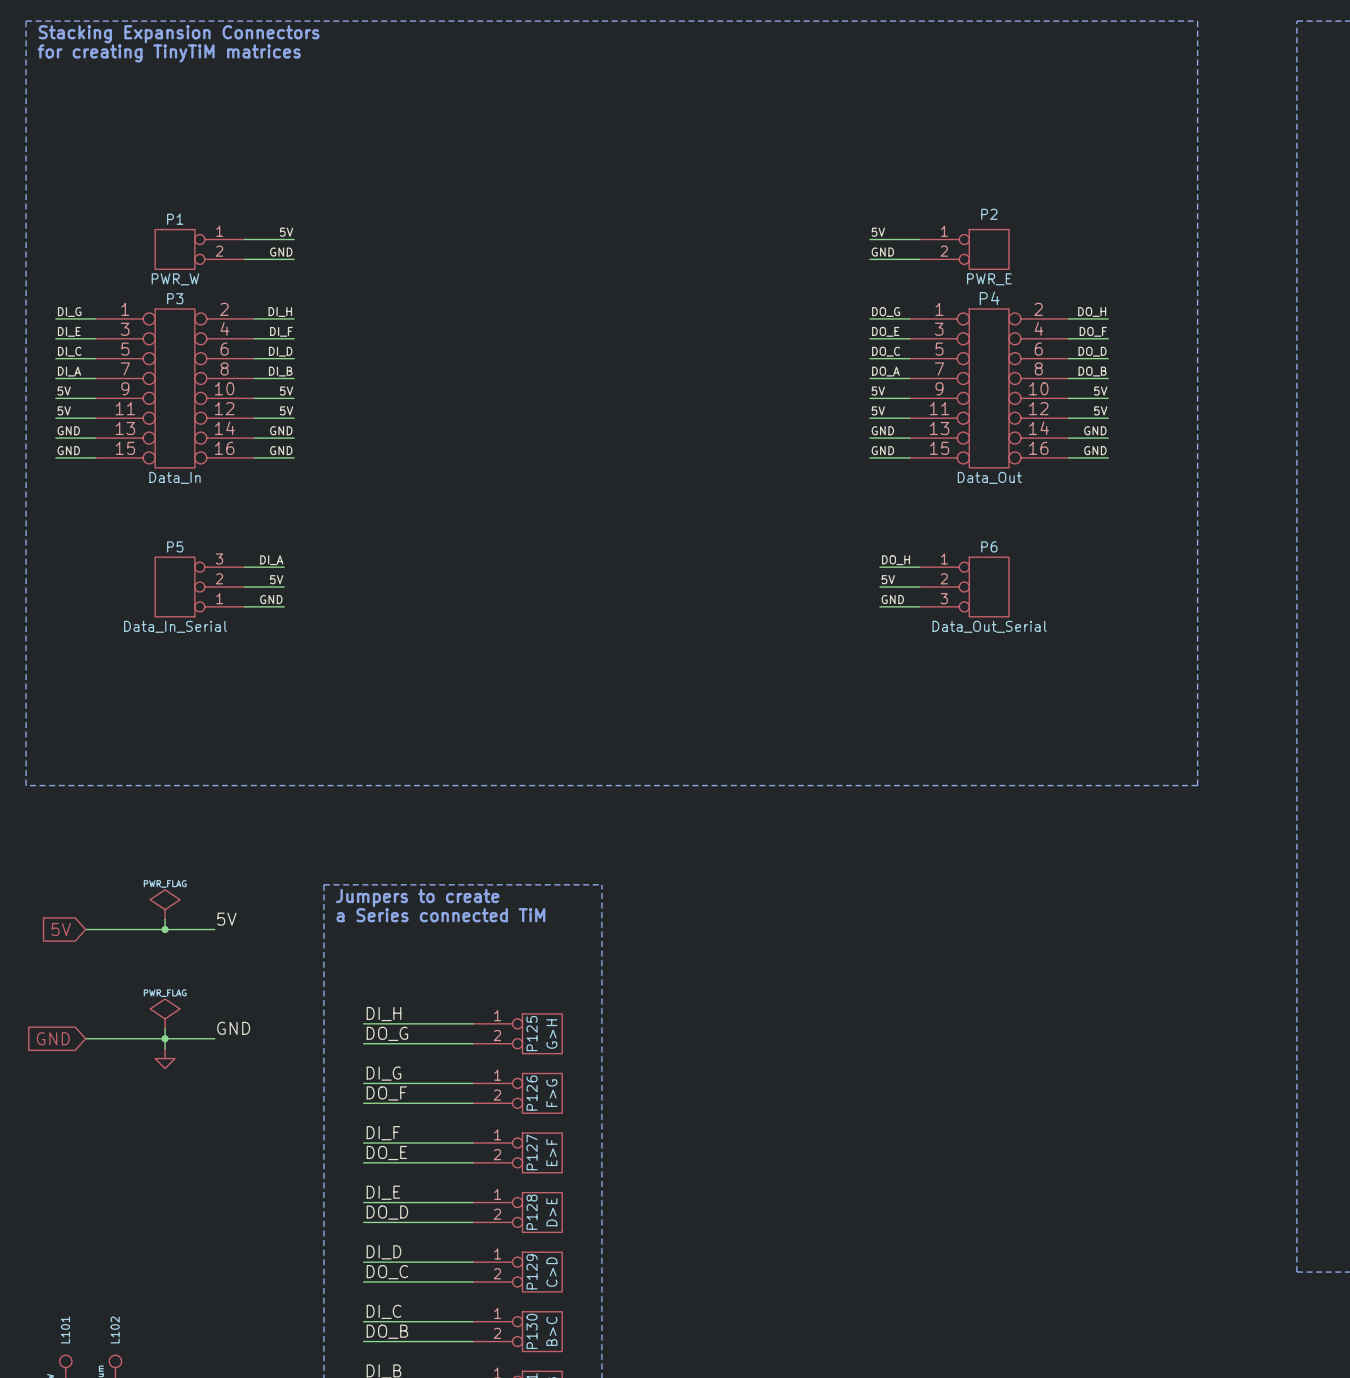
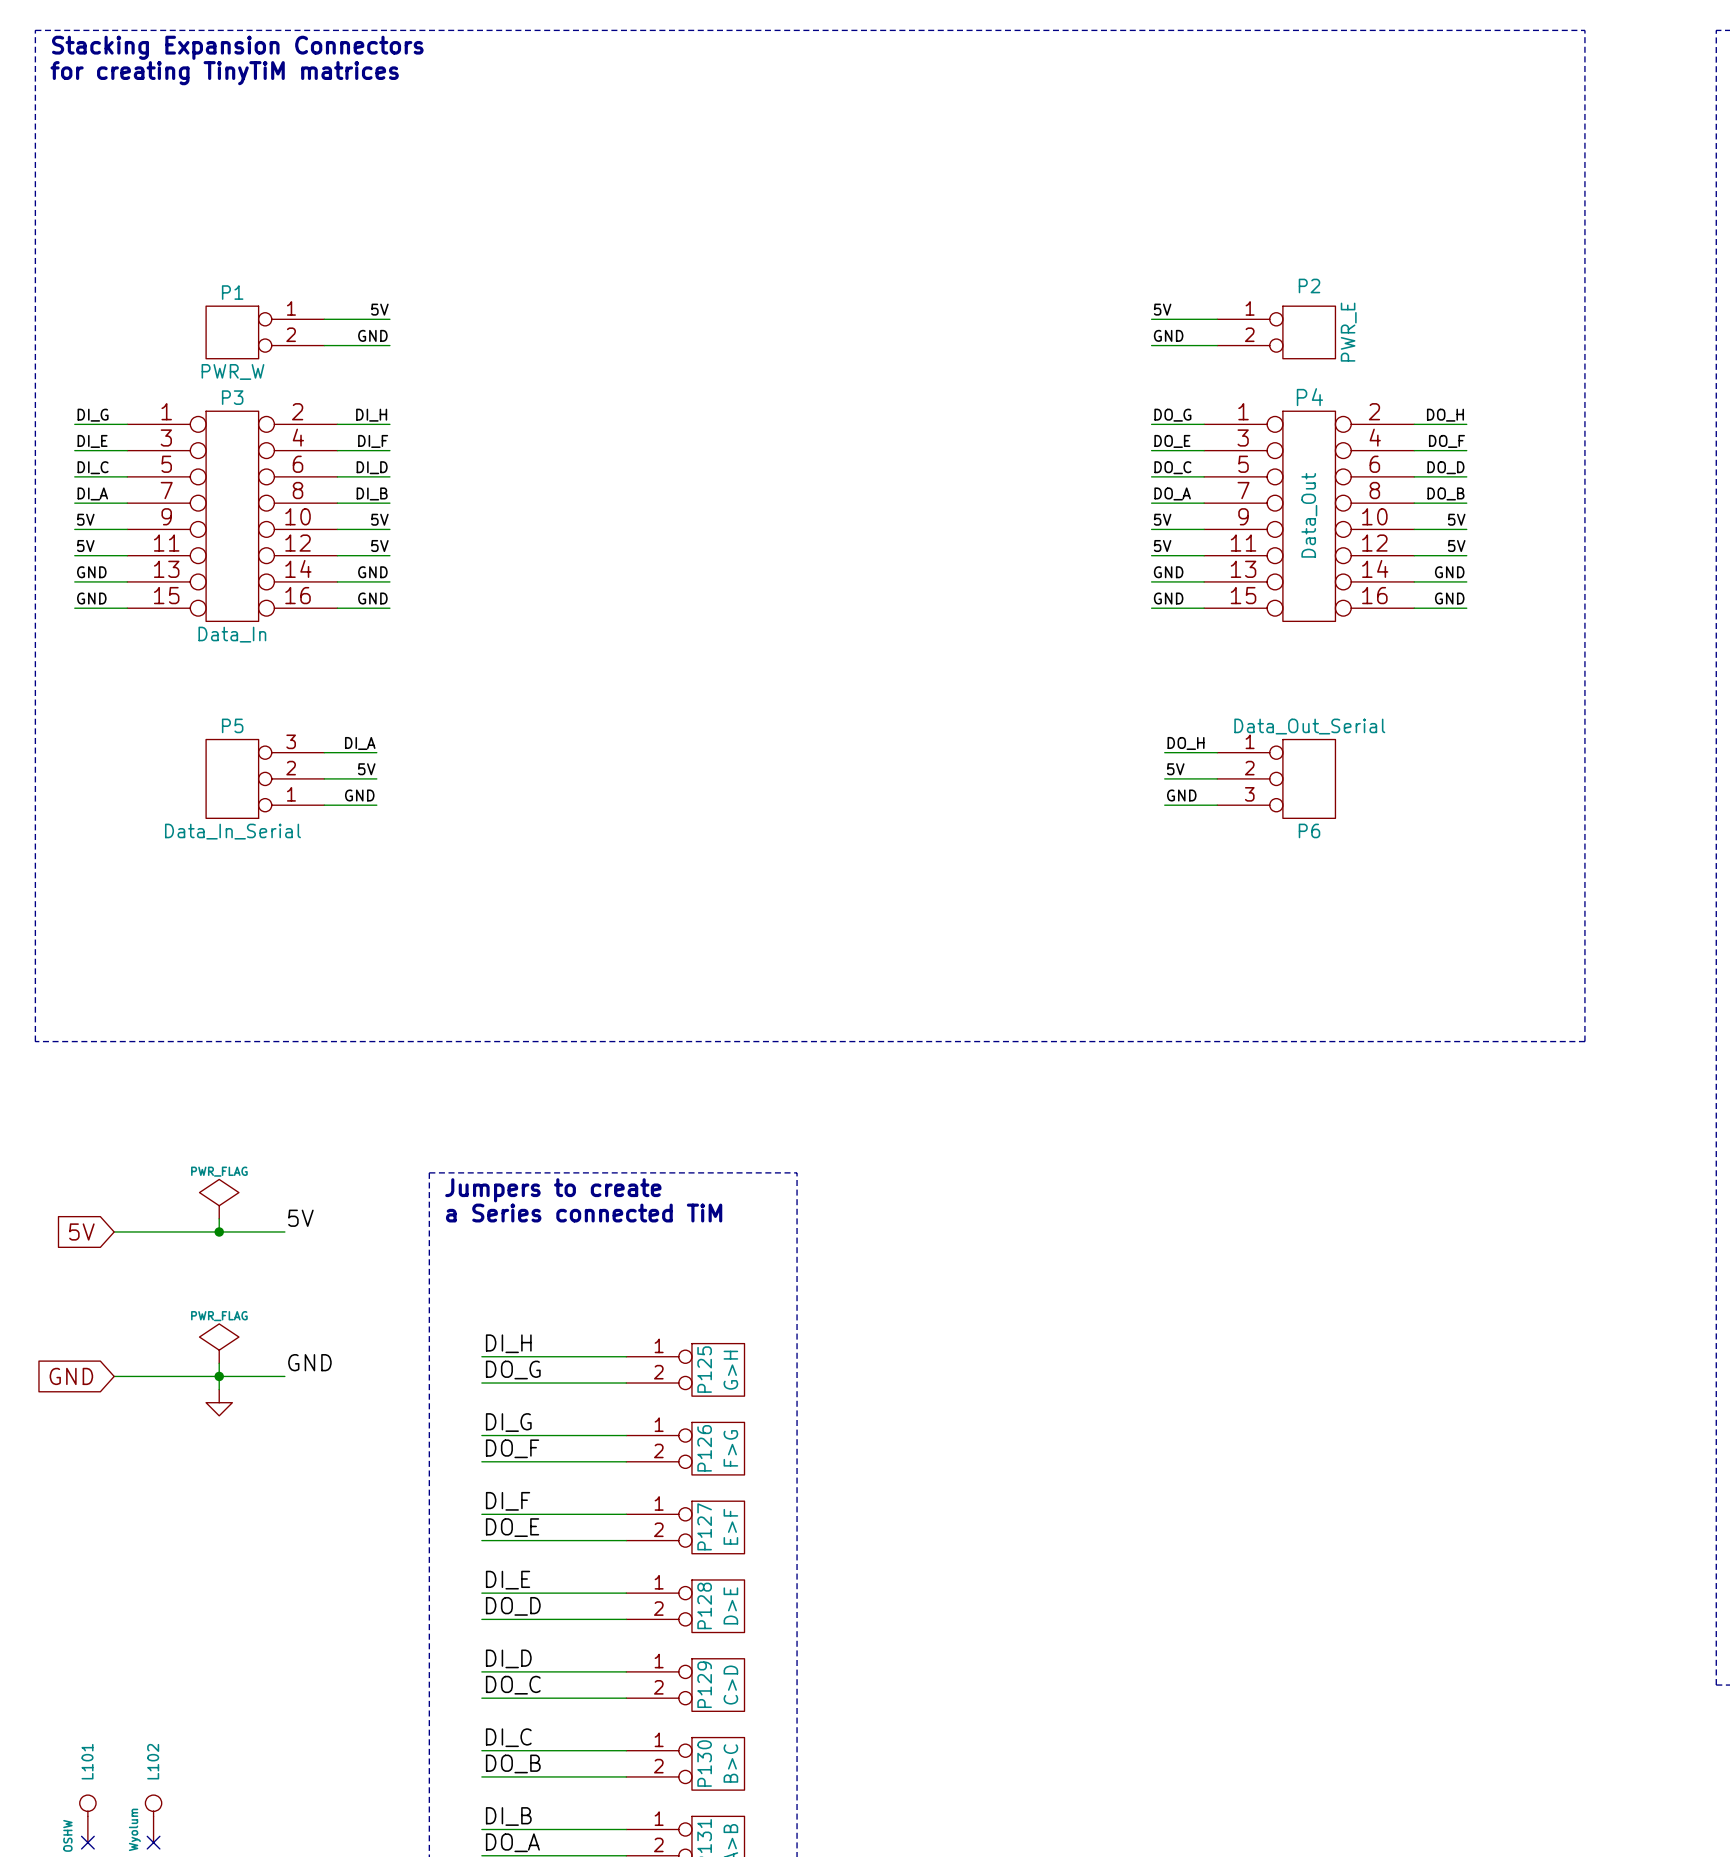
P2 value rotation: 0° (989, 279) -> 90° counterclockwise (1348, 332)
P4 value rotation: 0° (989, 477) -> 90° counterclockwise (1309, 515)
P4 value position: Data_Out (989, 477) -> Data_Out (1309, 515)
P6 name position: P6 (989, 546) -> P6 (1309, 830)
P6 value position: Data_Out_Serial (989, 626) -> Data_Out_Serial (1309, 726)

